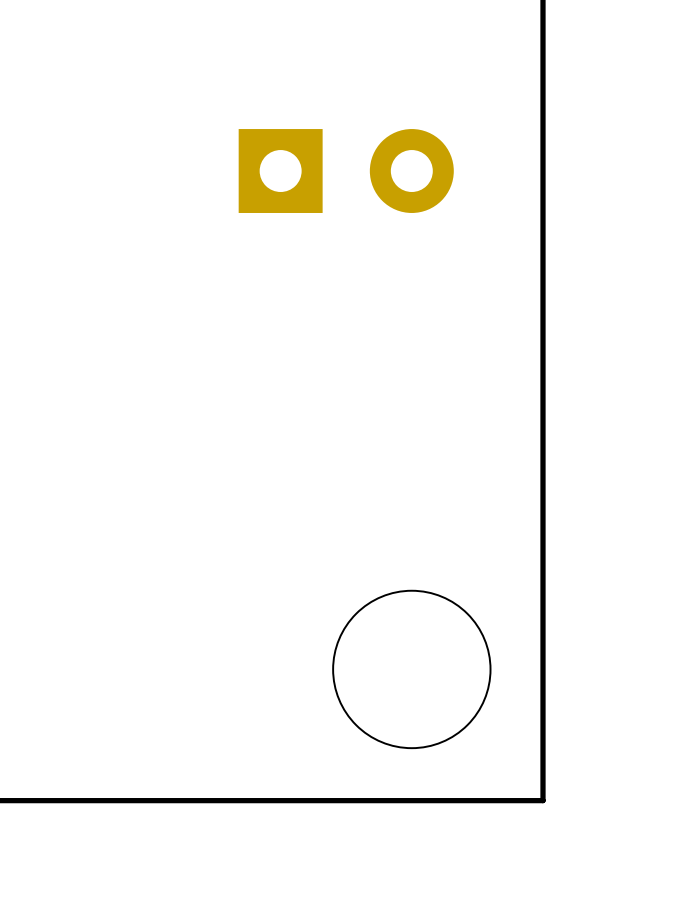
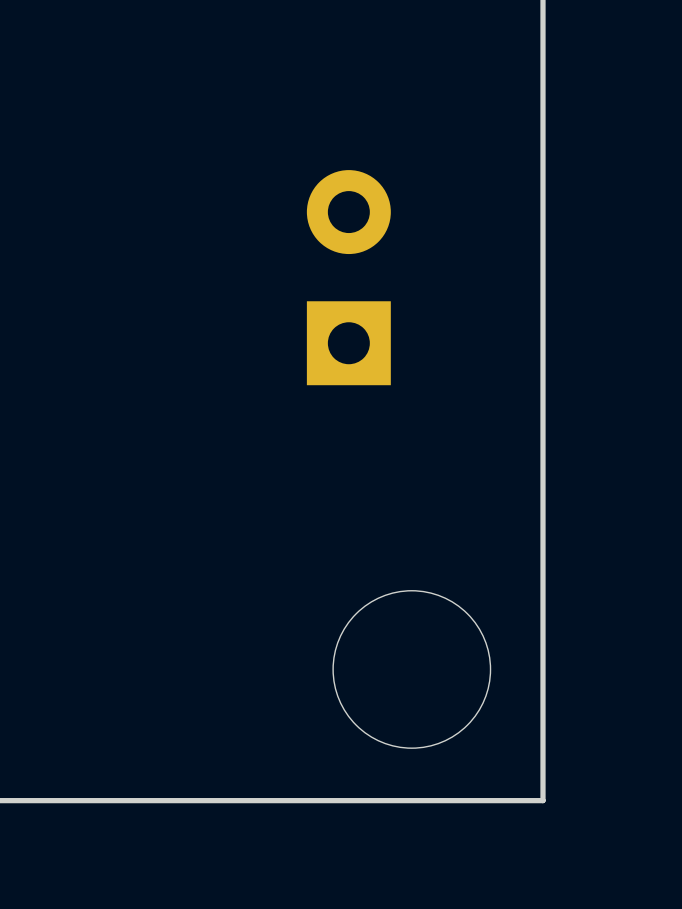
part rotation: 0° (346, 171) -> 90° counterclockwise (348, 277)

